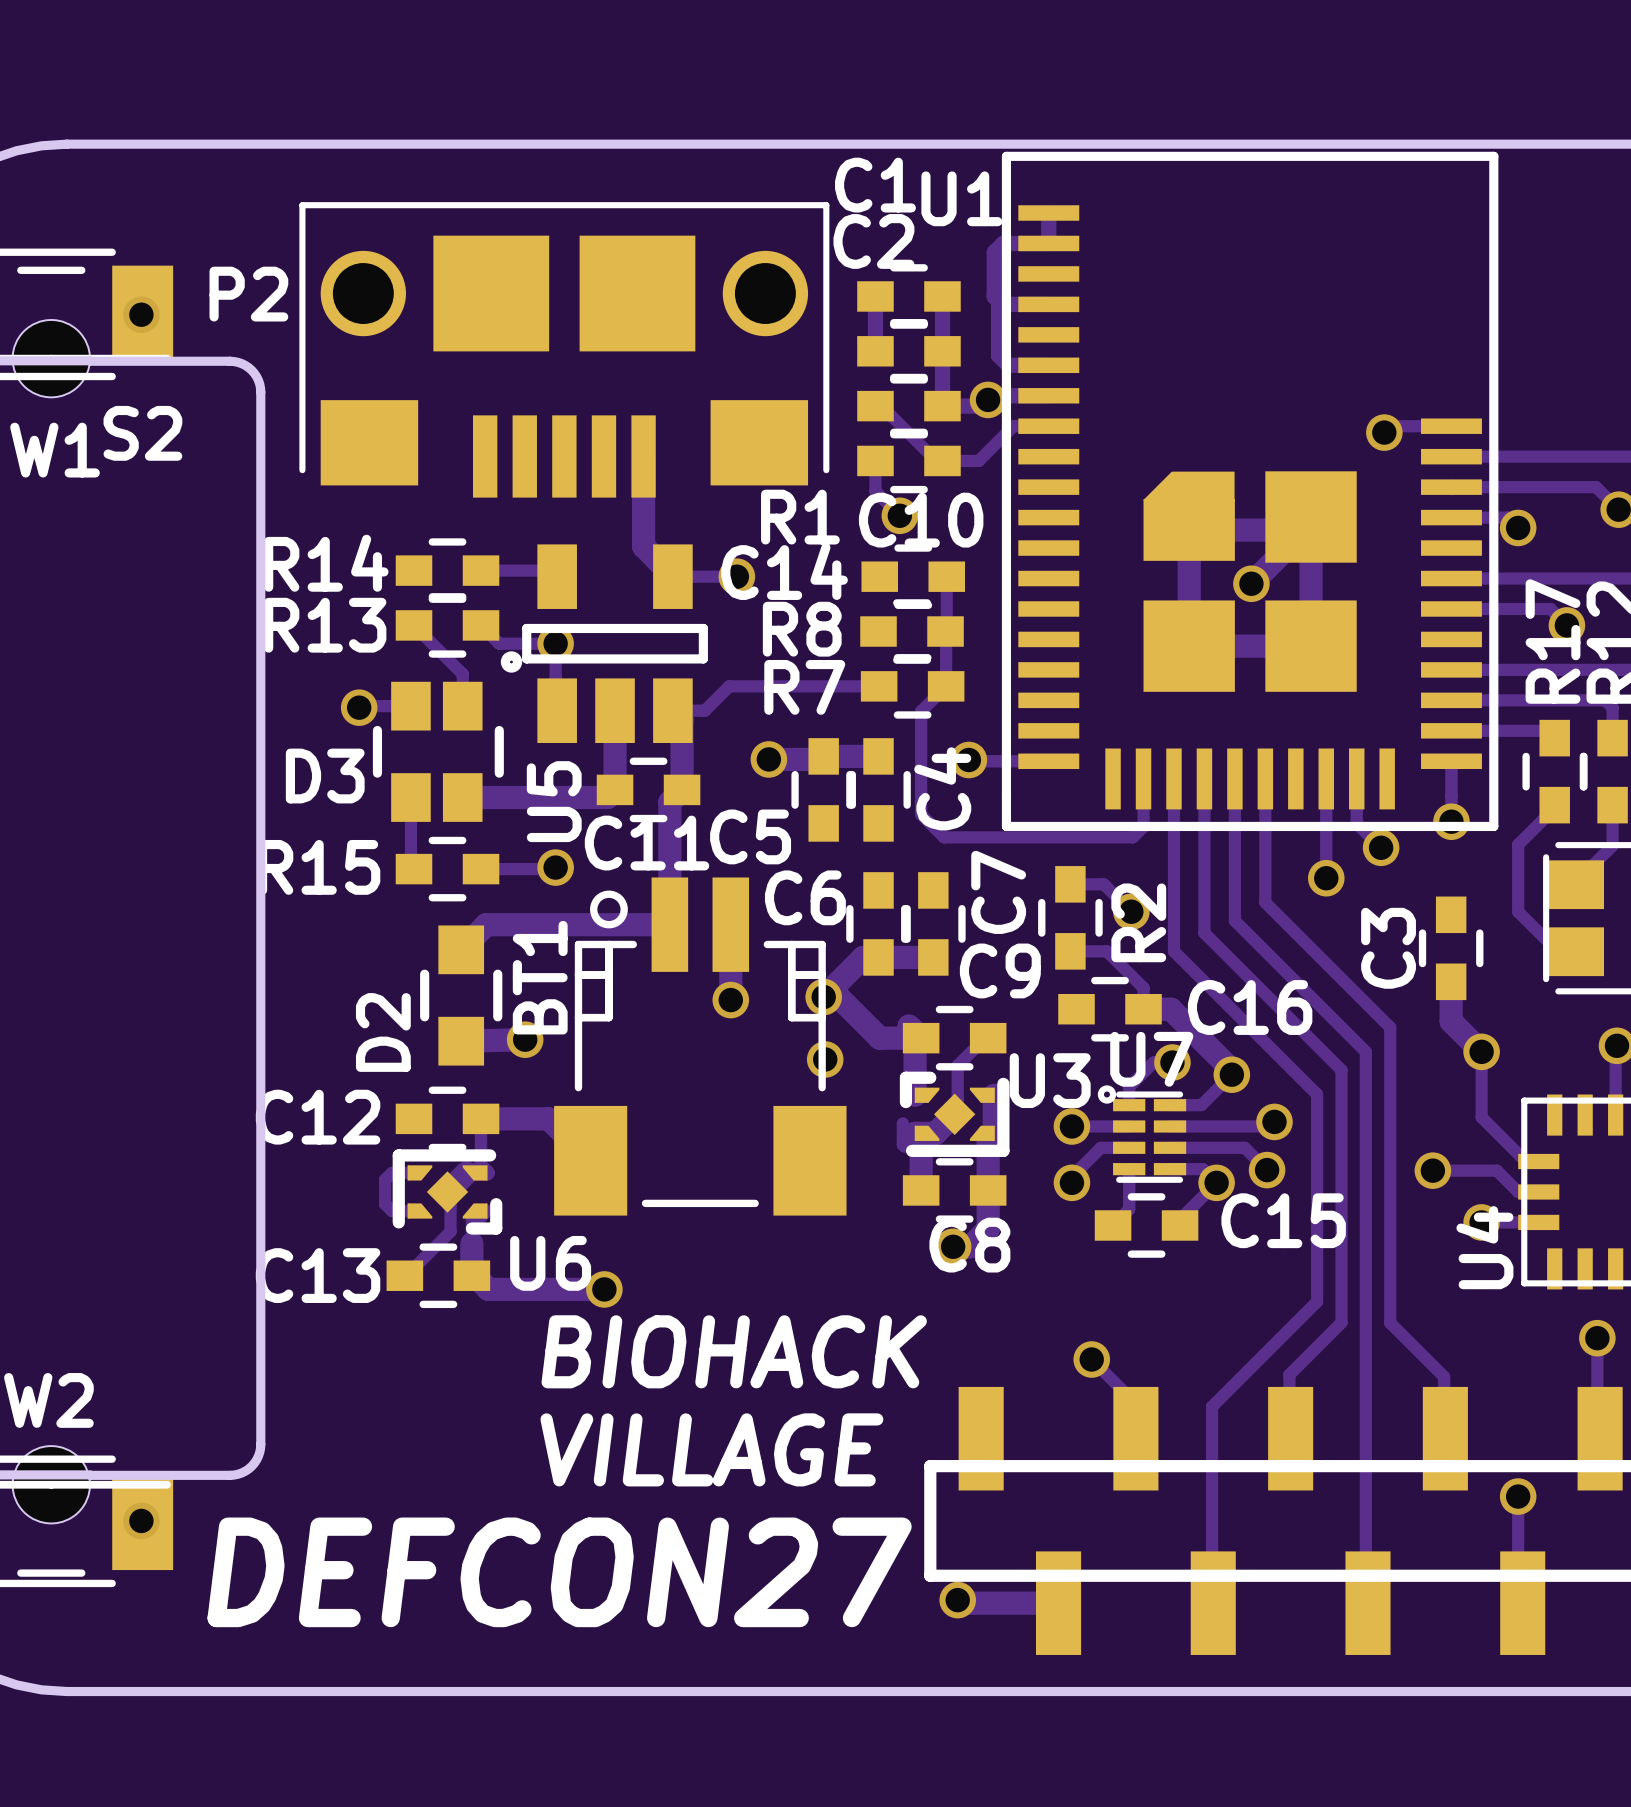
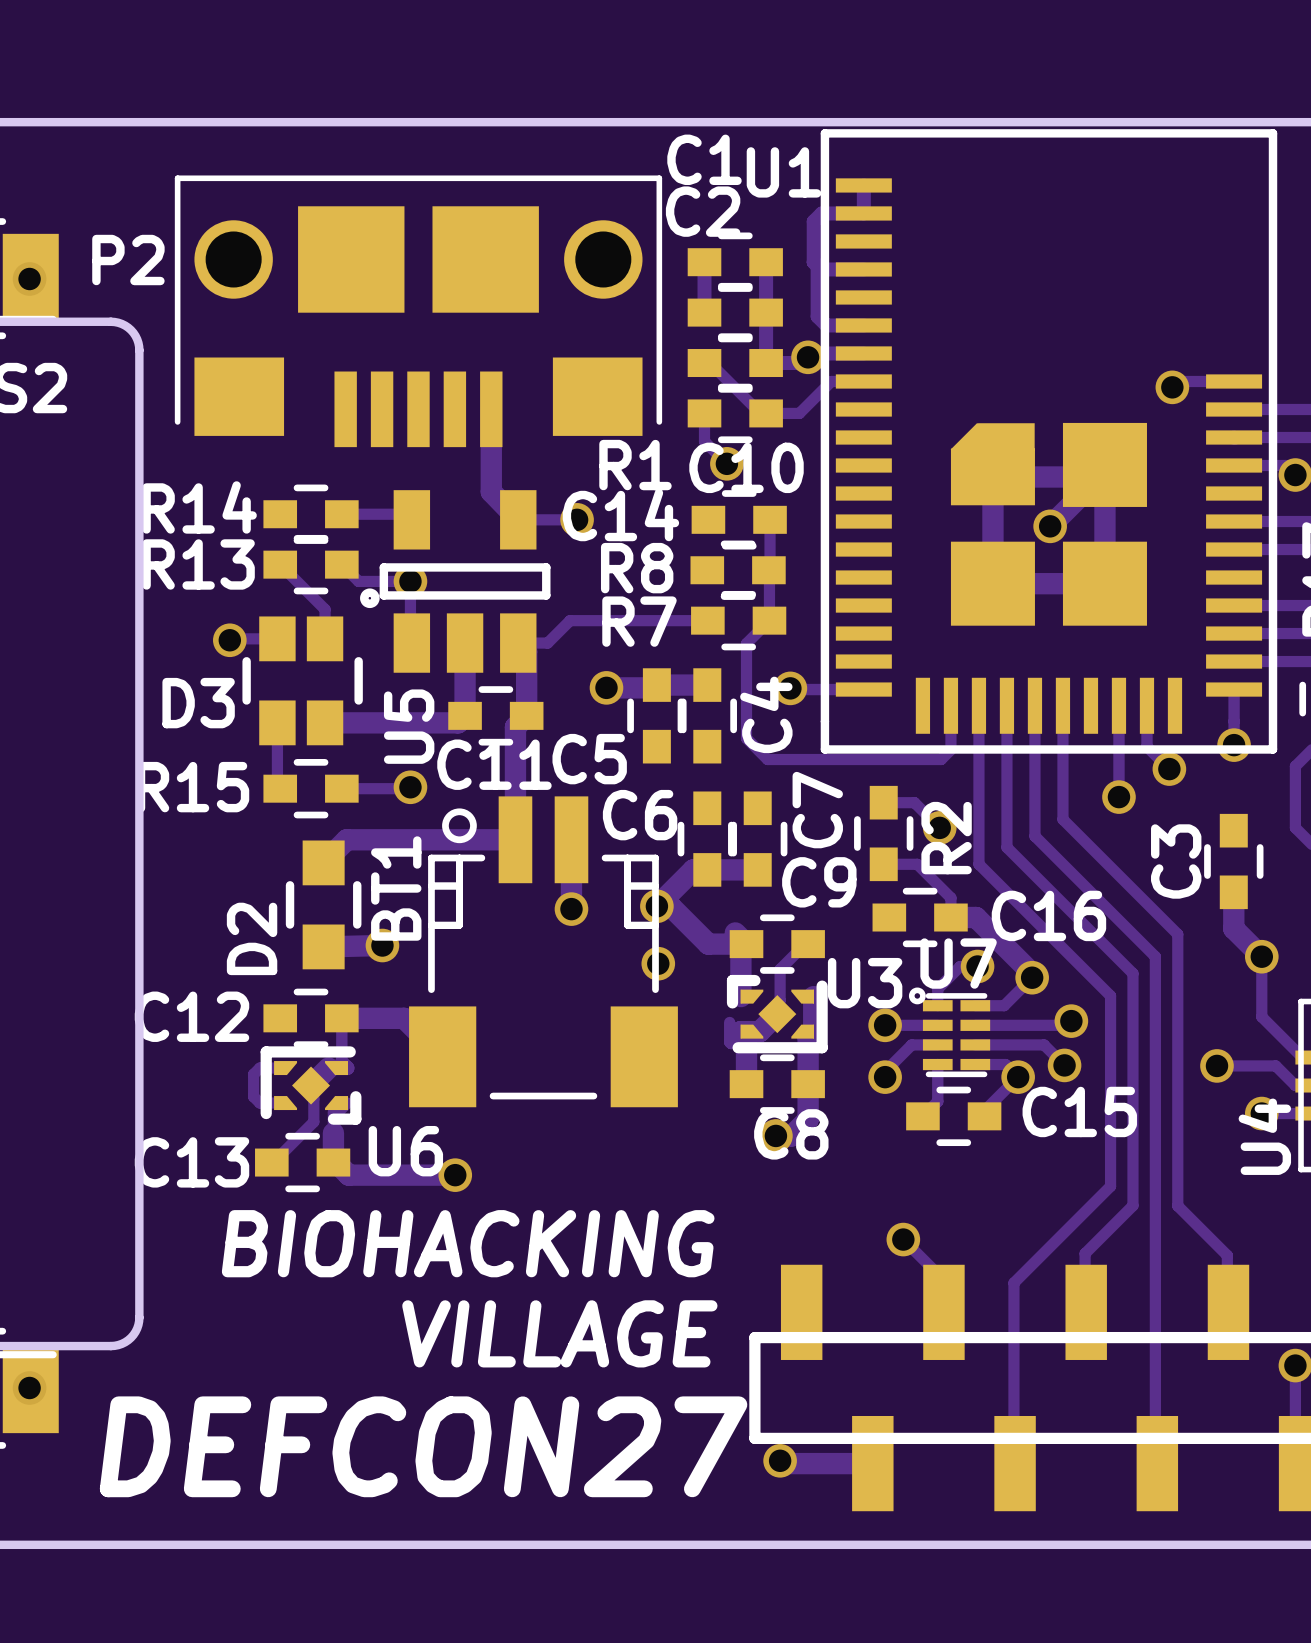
text: BIOHACK (734, 1351) -> BIOHACKING (468, 1243)
text position: VILLAGE (711, 1449) -> VILLAGE (559, 1333)
text position: DEFCON27 (559, 1572) -> DEFCON27 (423, 1446)

